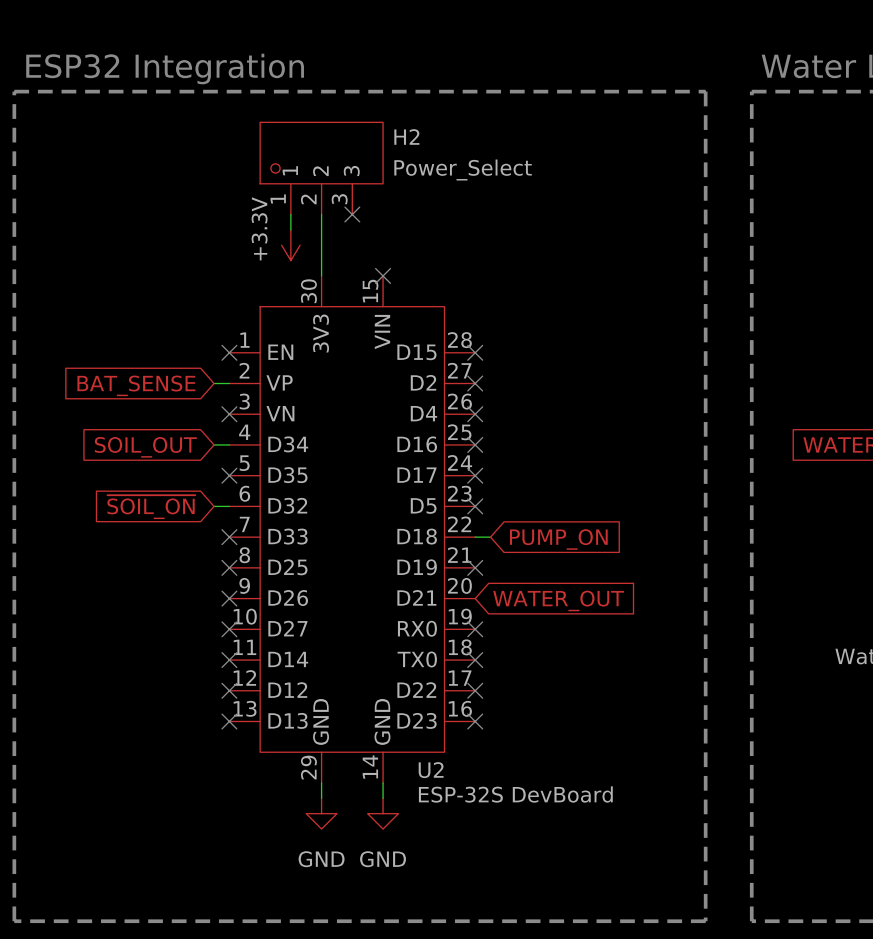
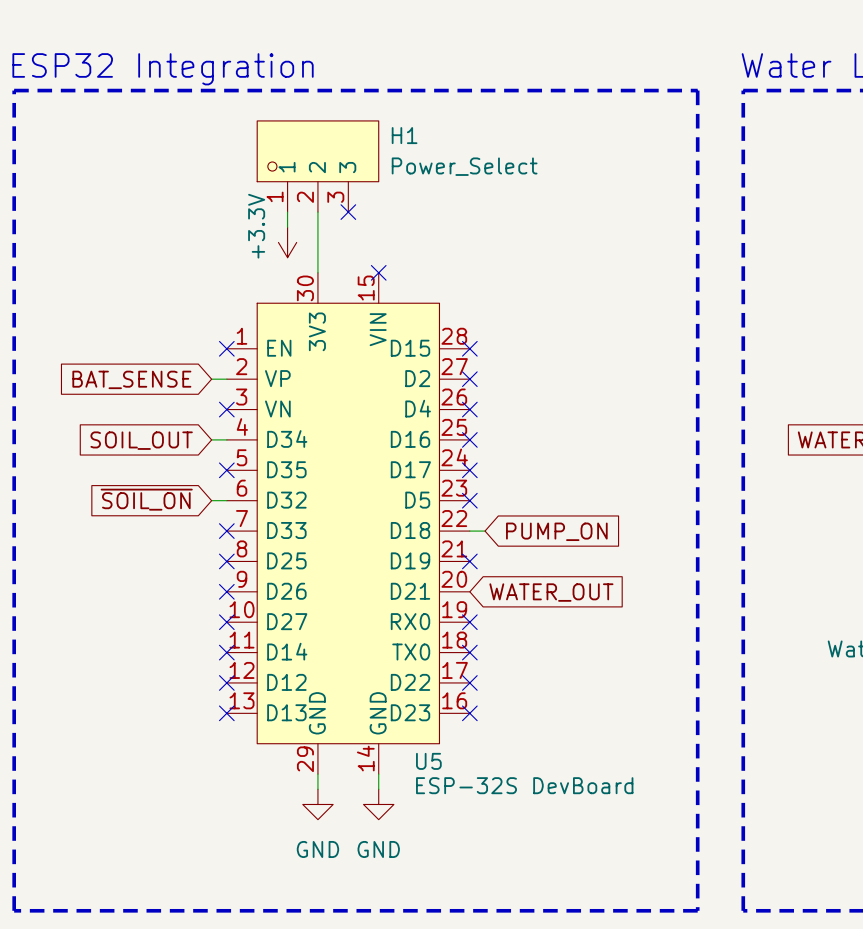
H2 name: H2 (406, 136) -> H1 (404, 135)
U2 name: U2 (431, 770) -> U5 (428, 761)

